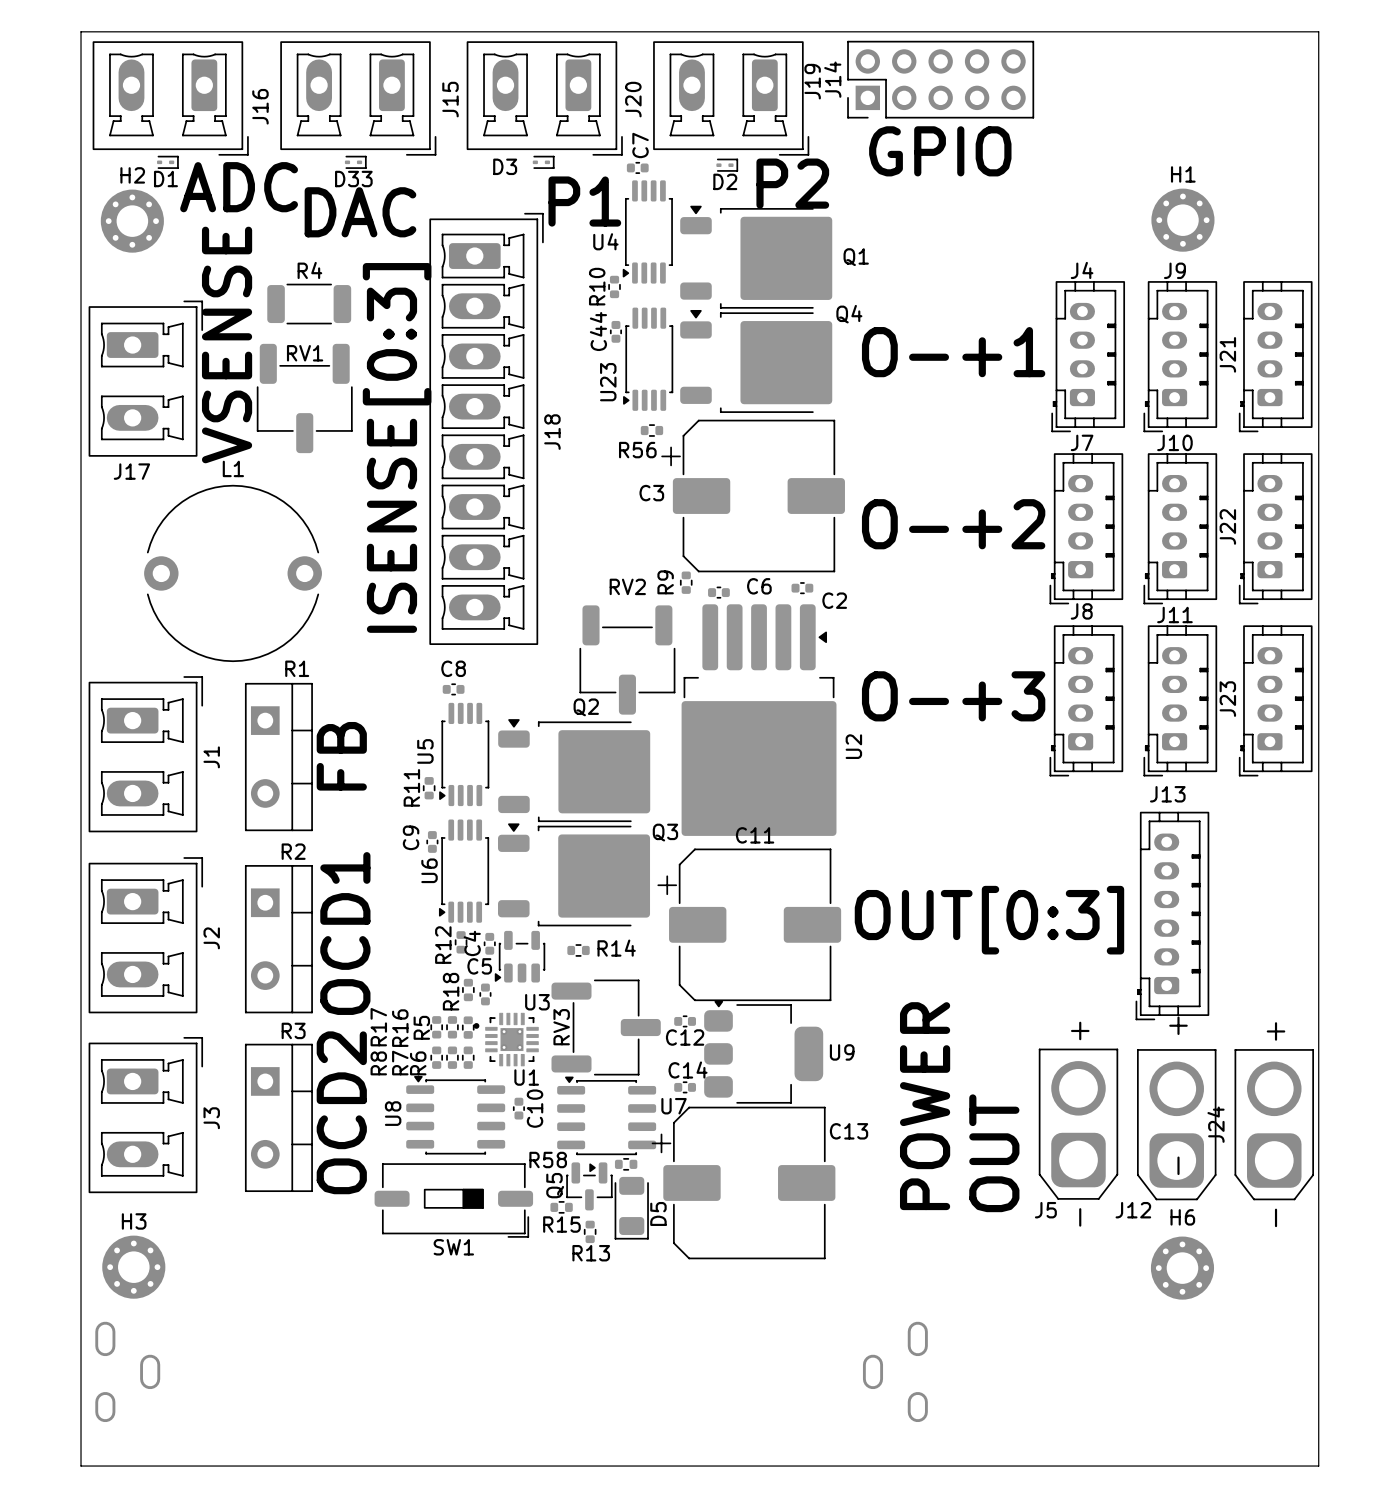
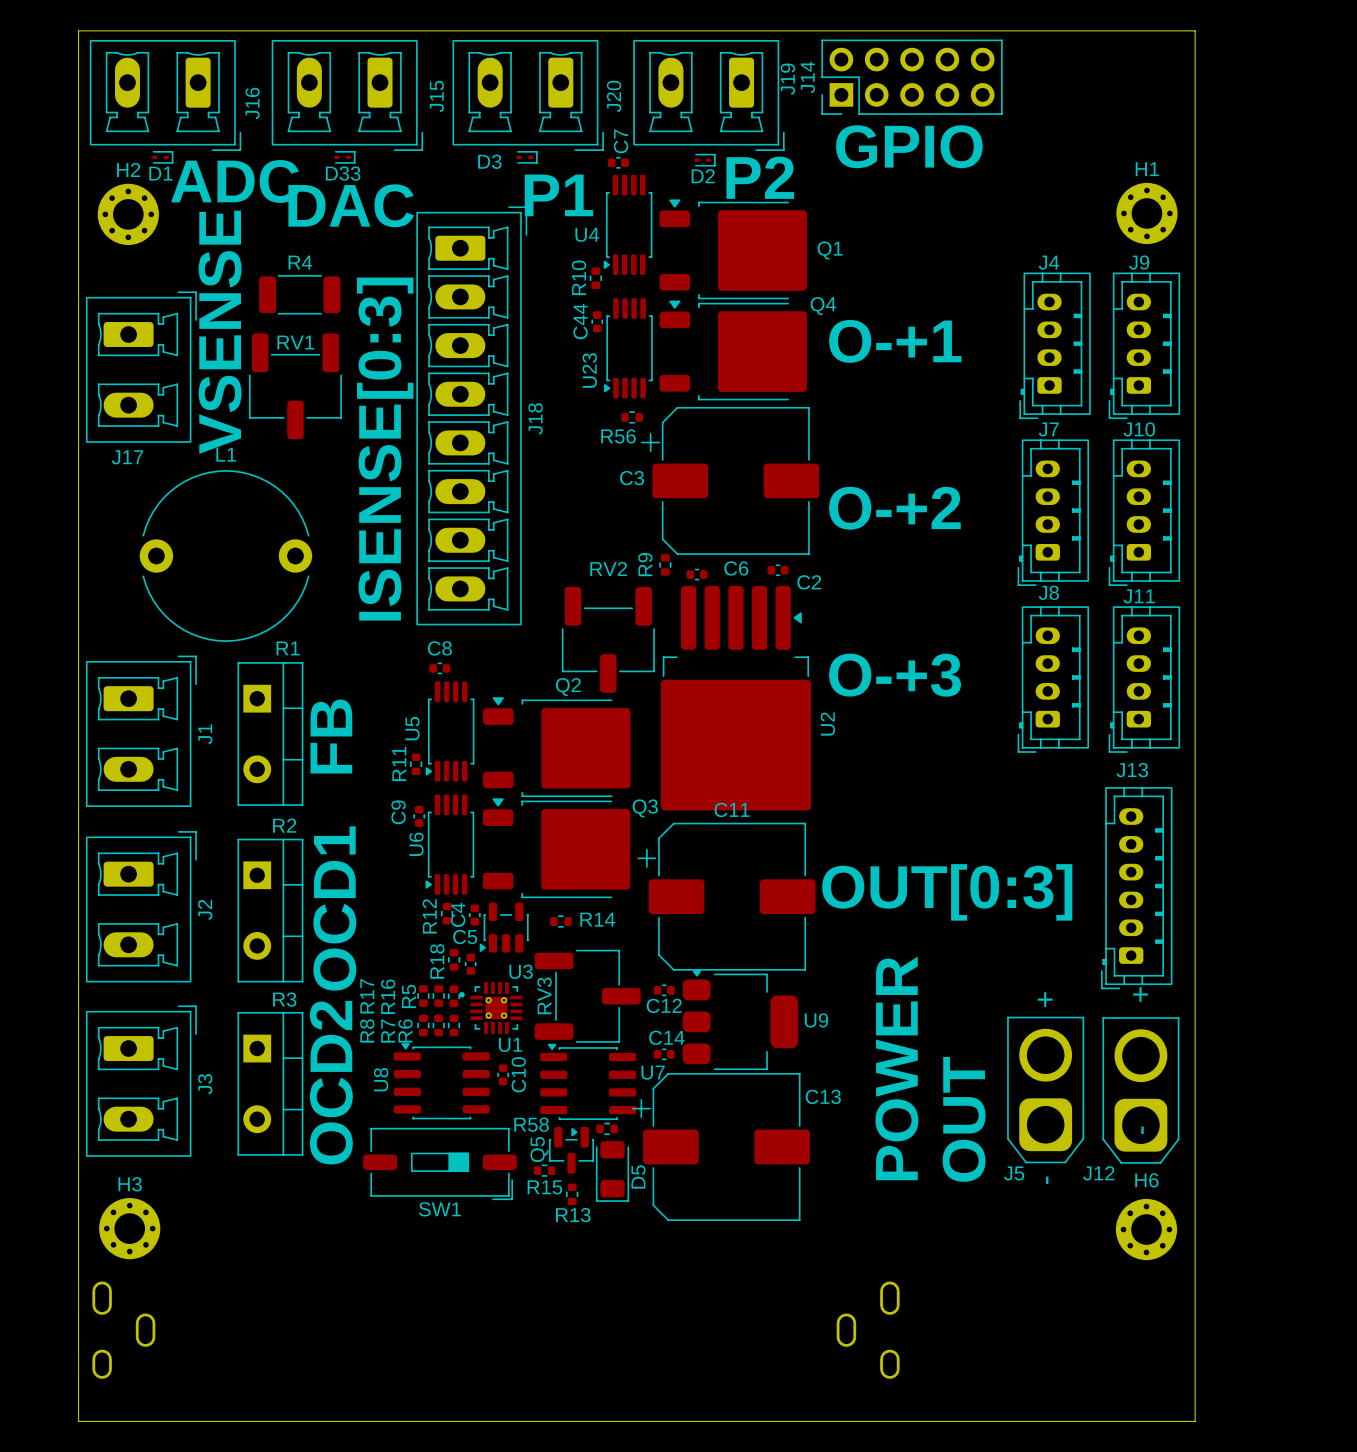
board edge: (1232, 31) (1318, 31) (1318, 1466) (1232, 1466) -> (1195, 30) (1195, 1421)
J21: (1275, 356) -> none
J22: (1275, 528) -> none
J23: (1275, 700) -> none
J24: (1274, 1124) -> none

